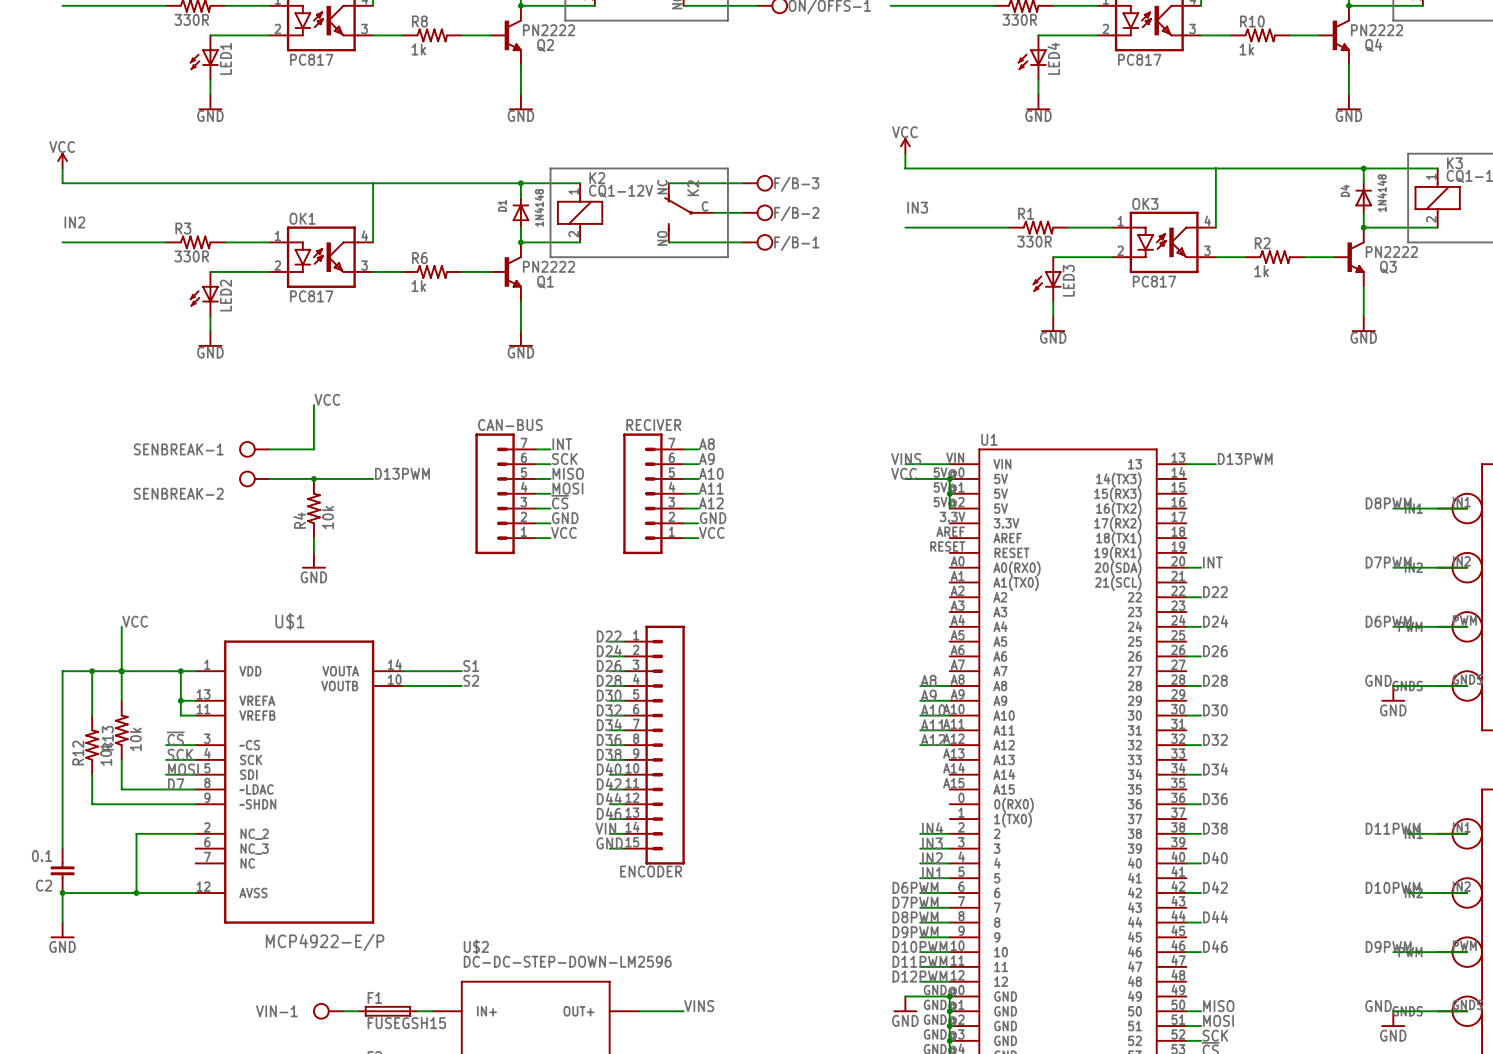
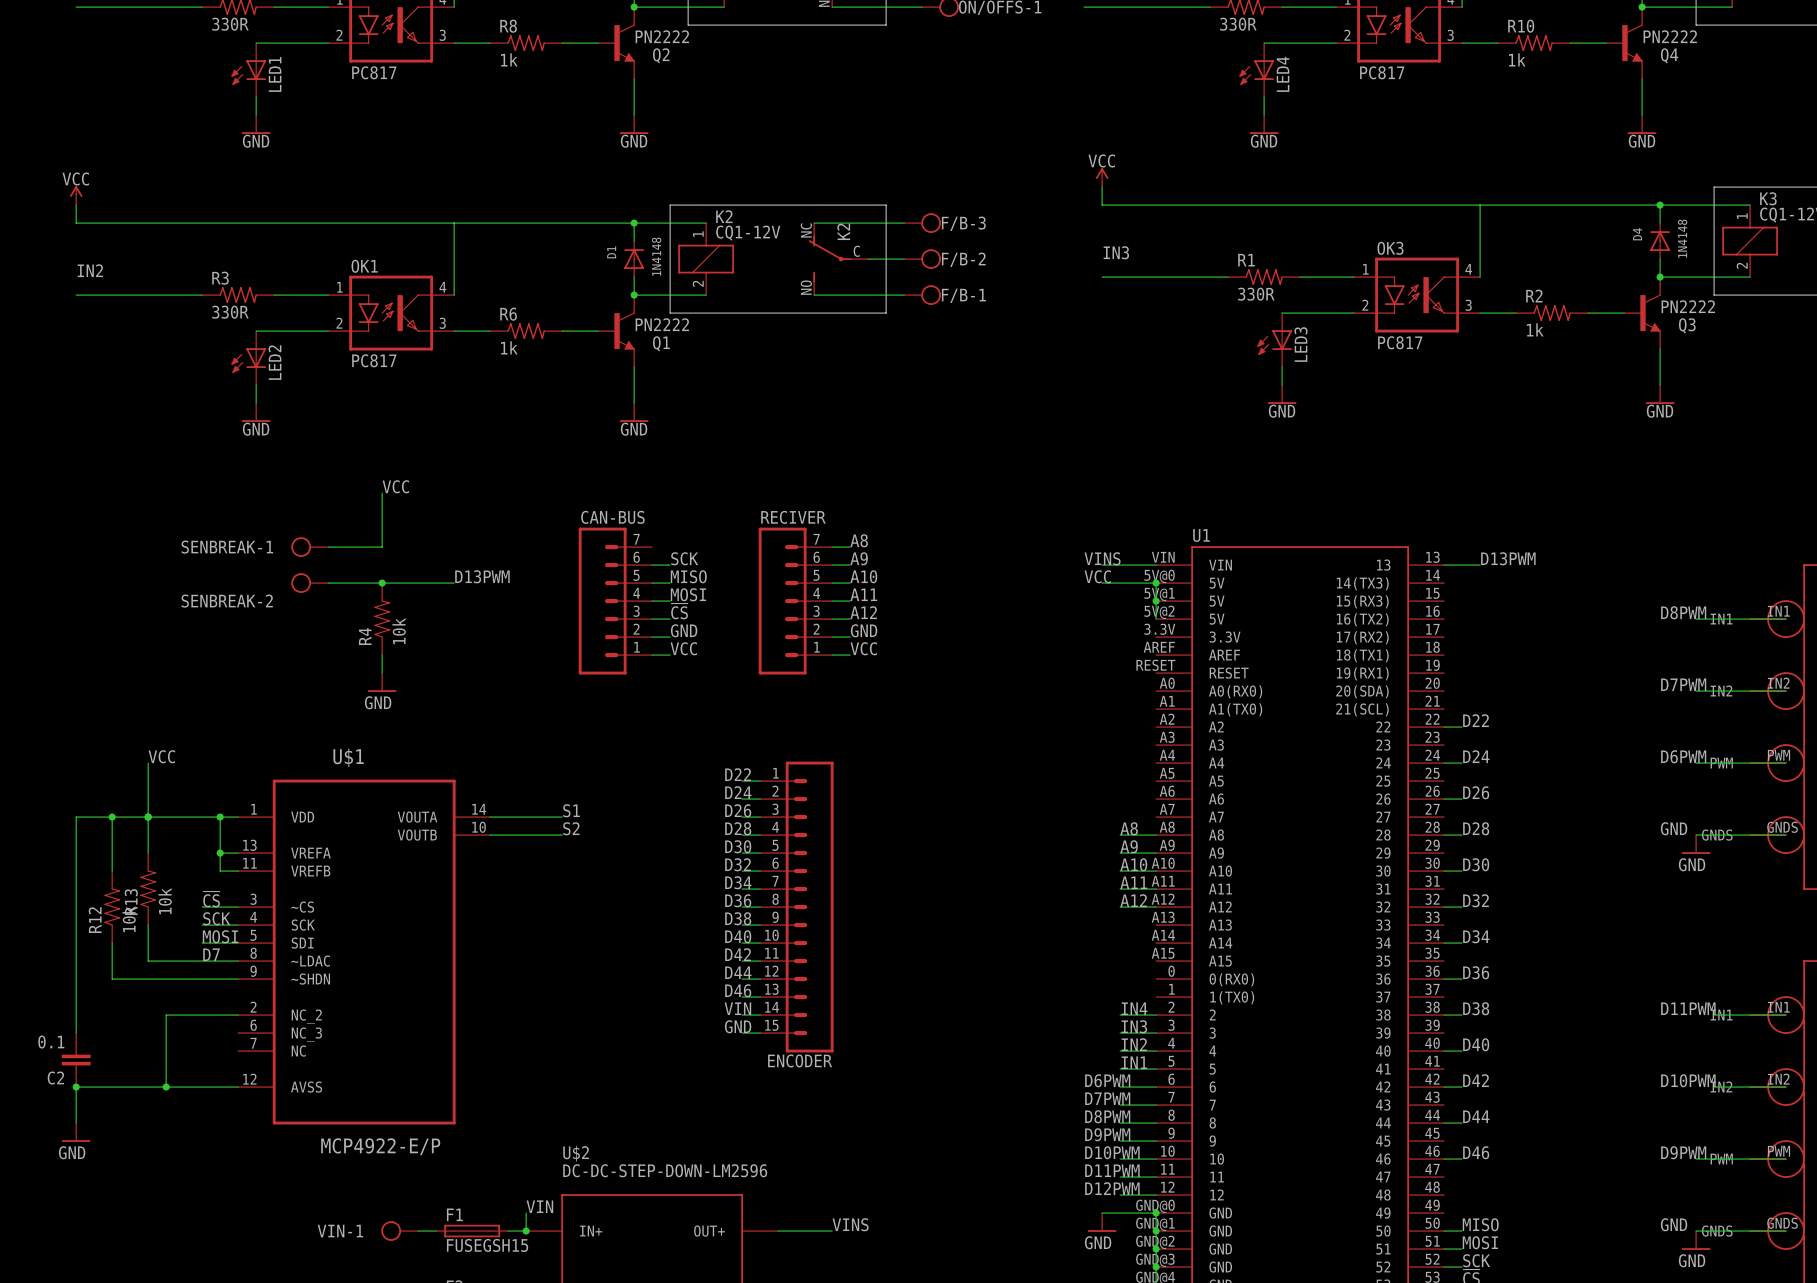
label: INT (562, 444) -> none
wire: (535, 449) (550, 449) -> none
label: INT (1212, 562) -> none
wire: (1186, 567) (1201, 567) -> none
label: none -> VIN (539, 1206)
wire: none -> (526, 1213) (526, 1231)
junction: none -> (526, 1231)

